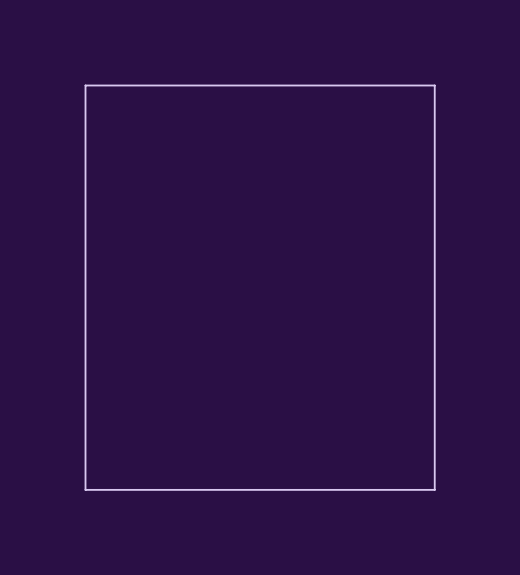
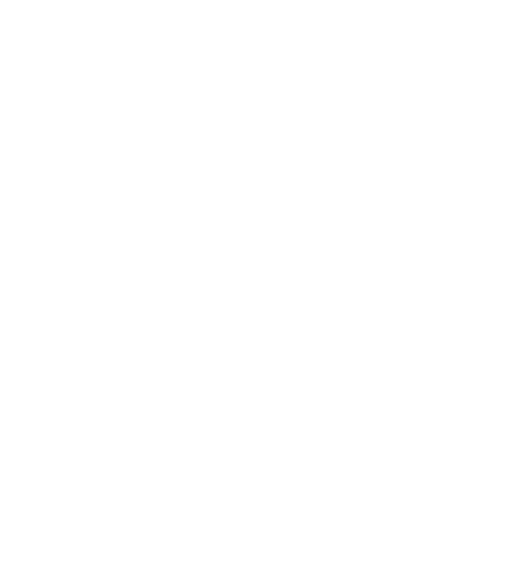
board edge: (434, 85) (85, 85) (85, 489) (434, 489) (434, 85) -> none

